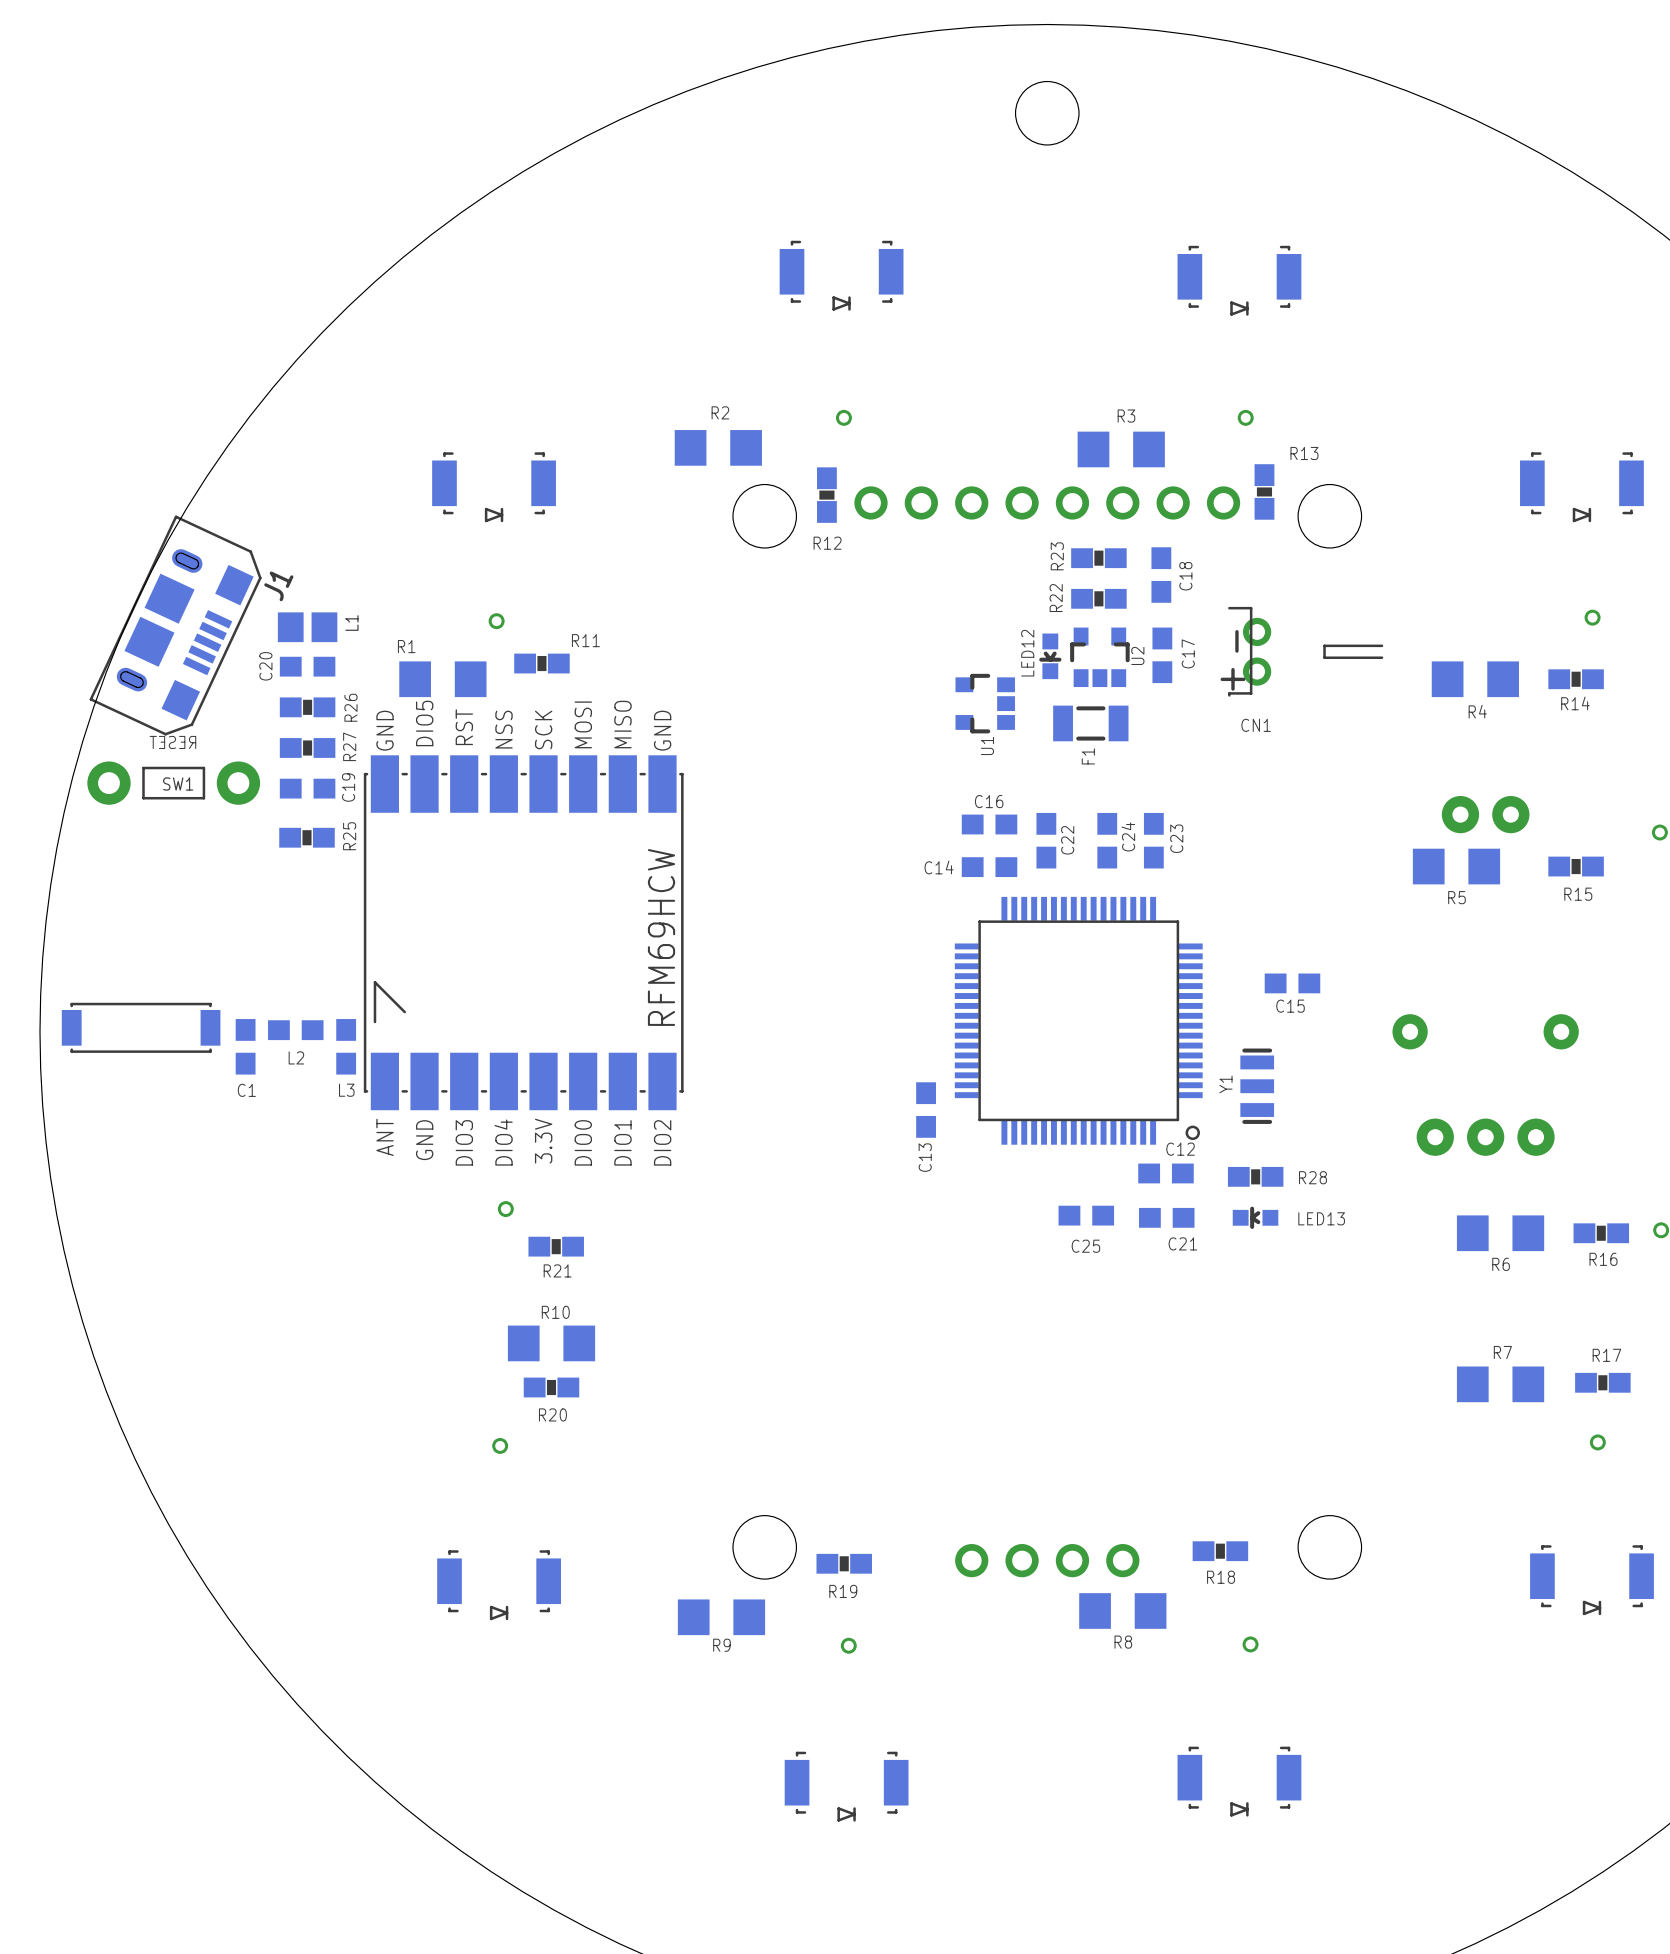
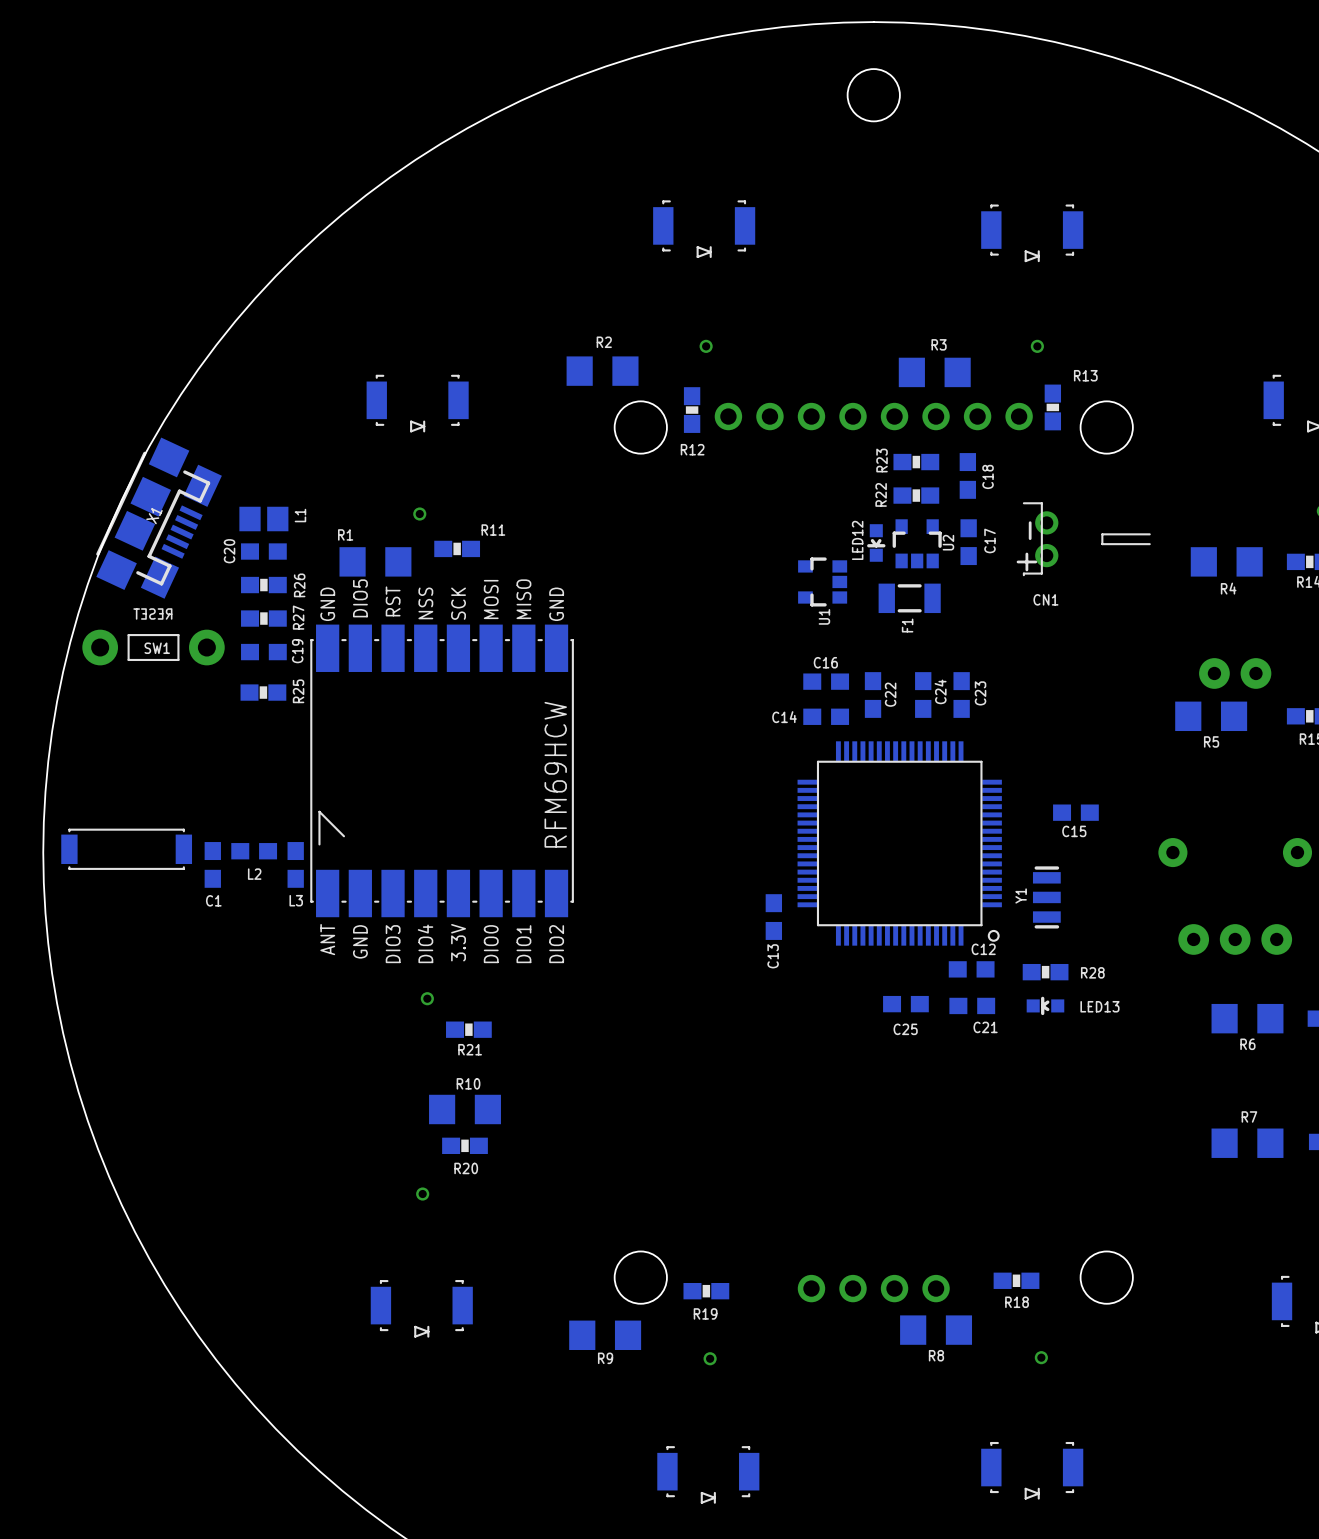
J1: (175, 625) -> none
X1: none -> (159, 518)

